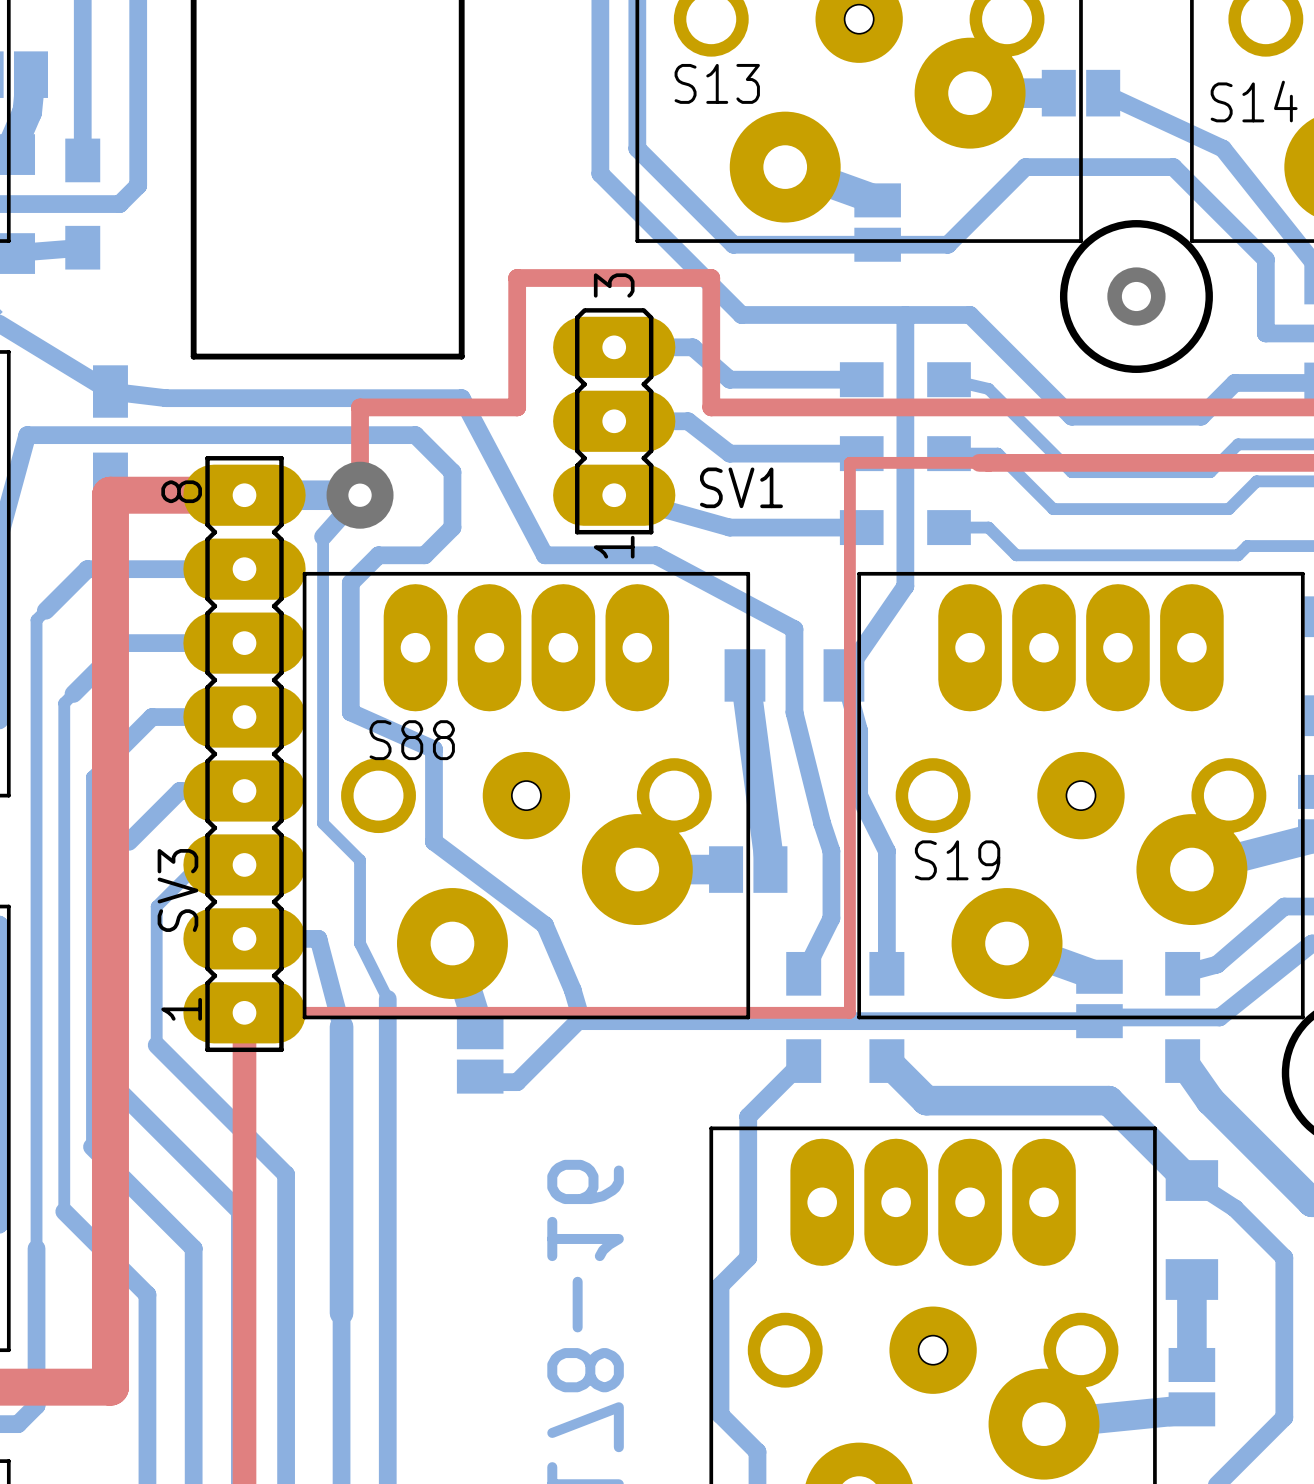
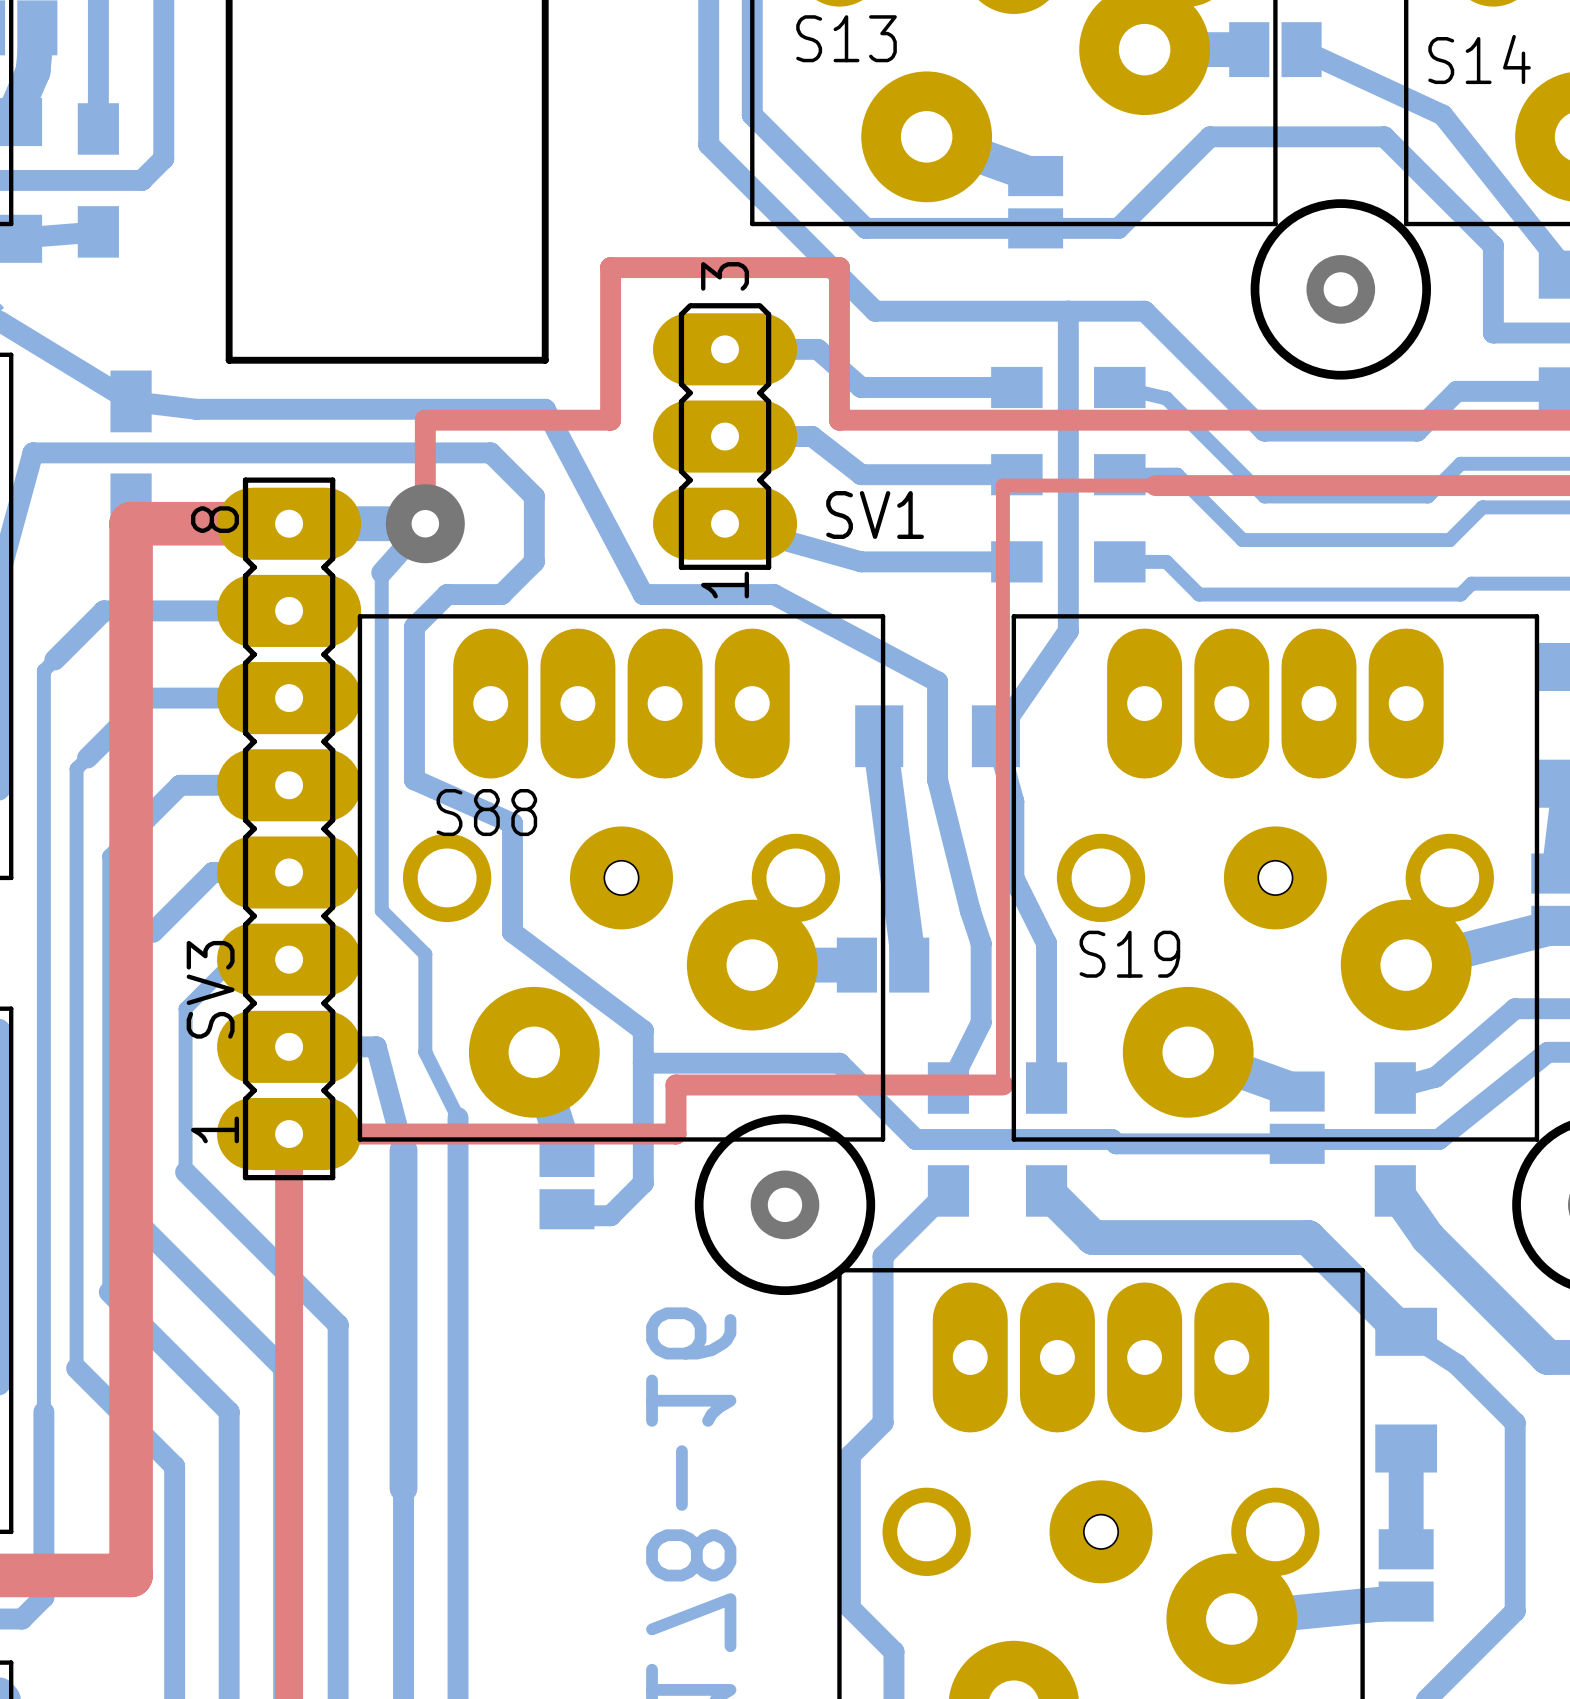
bottom track: (544, 925) (572, 989) (581, 1021) -> (643, 1030) (643, 1183)
top track: (849, 971) (849, 1012) (572, 1012) -> (1002, 1084) (675, 1084) (675, 1134)
round board edge: none -> [694, 1114, 876, 1296]
top track width: thin (244, 1012) (572, 1012) -> thick (289, 1134) (675, 1134)
bottom track: (946, 1021) (578, 1021) (544, 1054) -> (1116, 1143) (1111, 1139) (915, 1139) (839, 1063) (643, 1063)
via: none -> (784, 1204)

